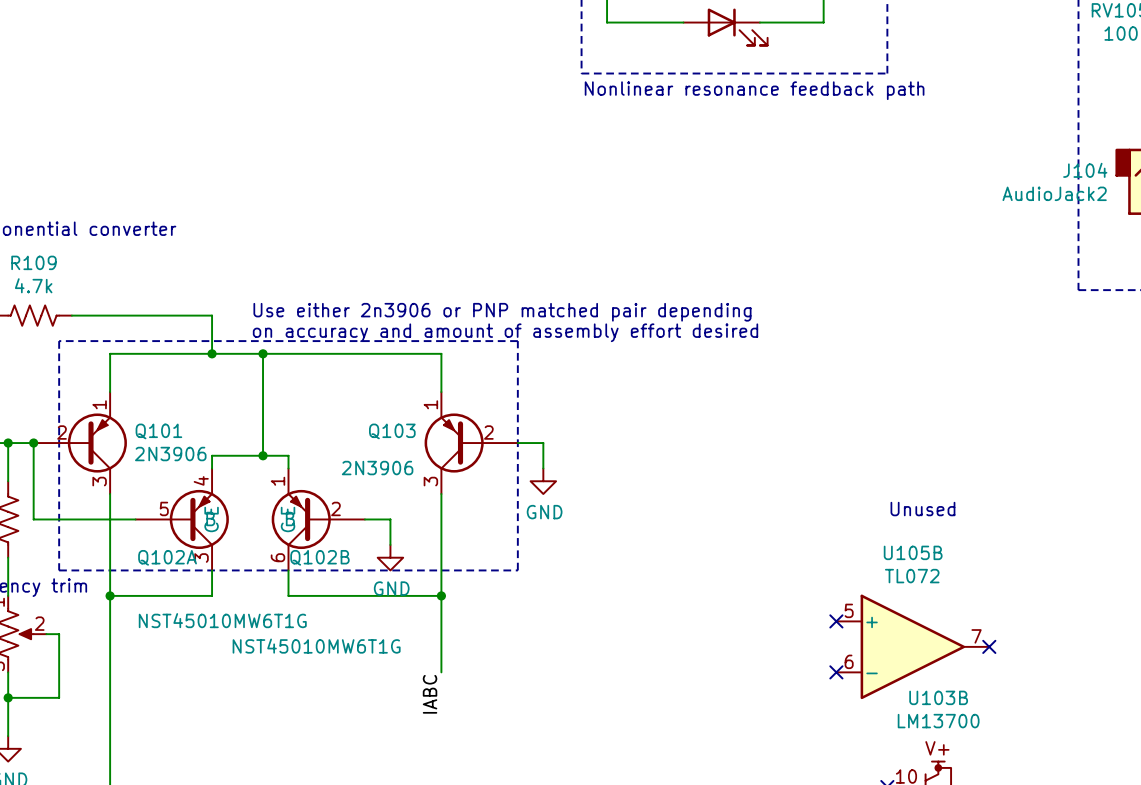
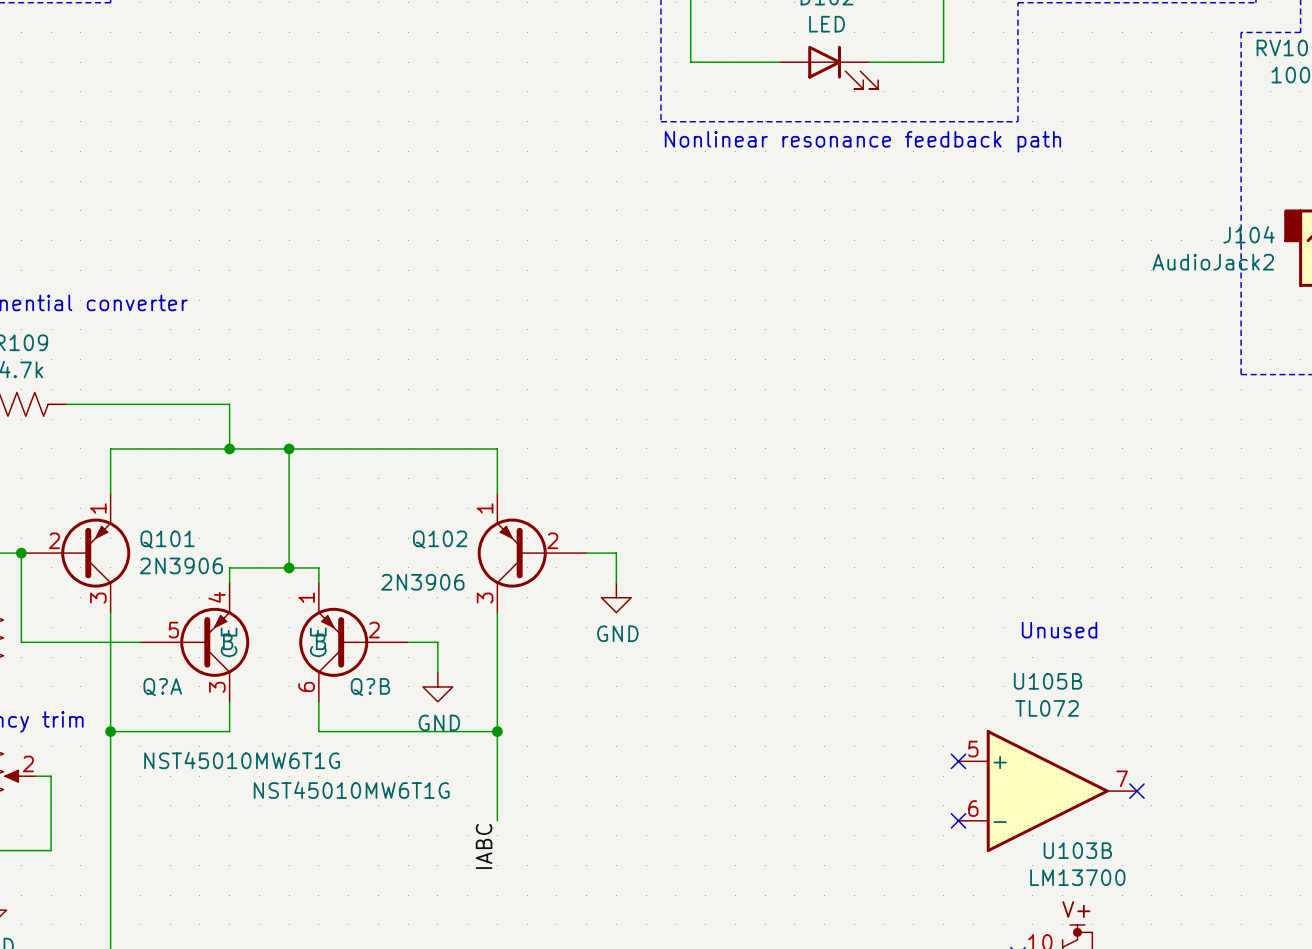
text: Use either 2n3906 or PNP matched pair depending (502, 312) -> none
text: on accuracy and amount of assembly effort desired (505, 332) -> none
line: (59, 341) (59, 570) (517, 570) (517, 341) (59, 341) -> none
Q103 name: Q103 (392, 431) -> Q102 (440, 539)
Q102A name: Q102A (167, 557) -> Q?A (162, 687)
Q102B name: Q102B (319, 557) -> Q?B (370, 687)

